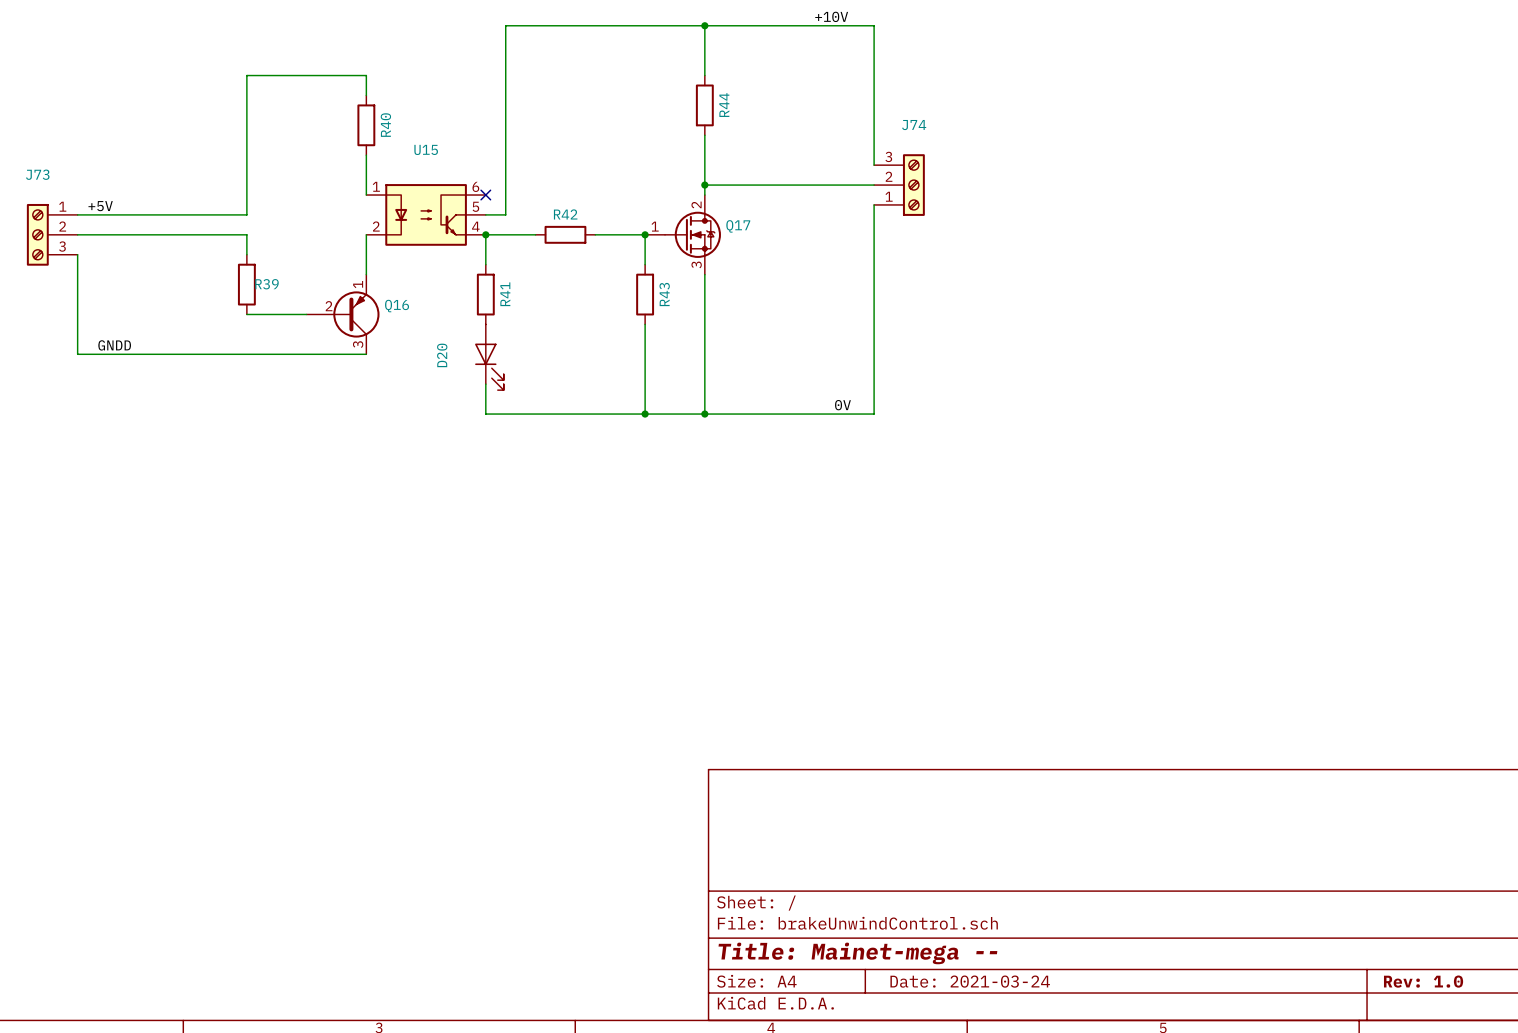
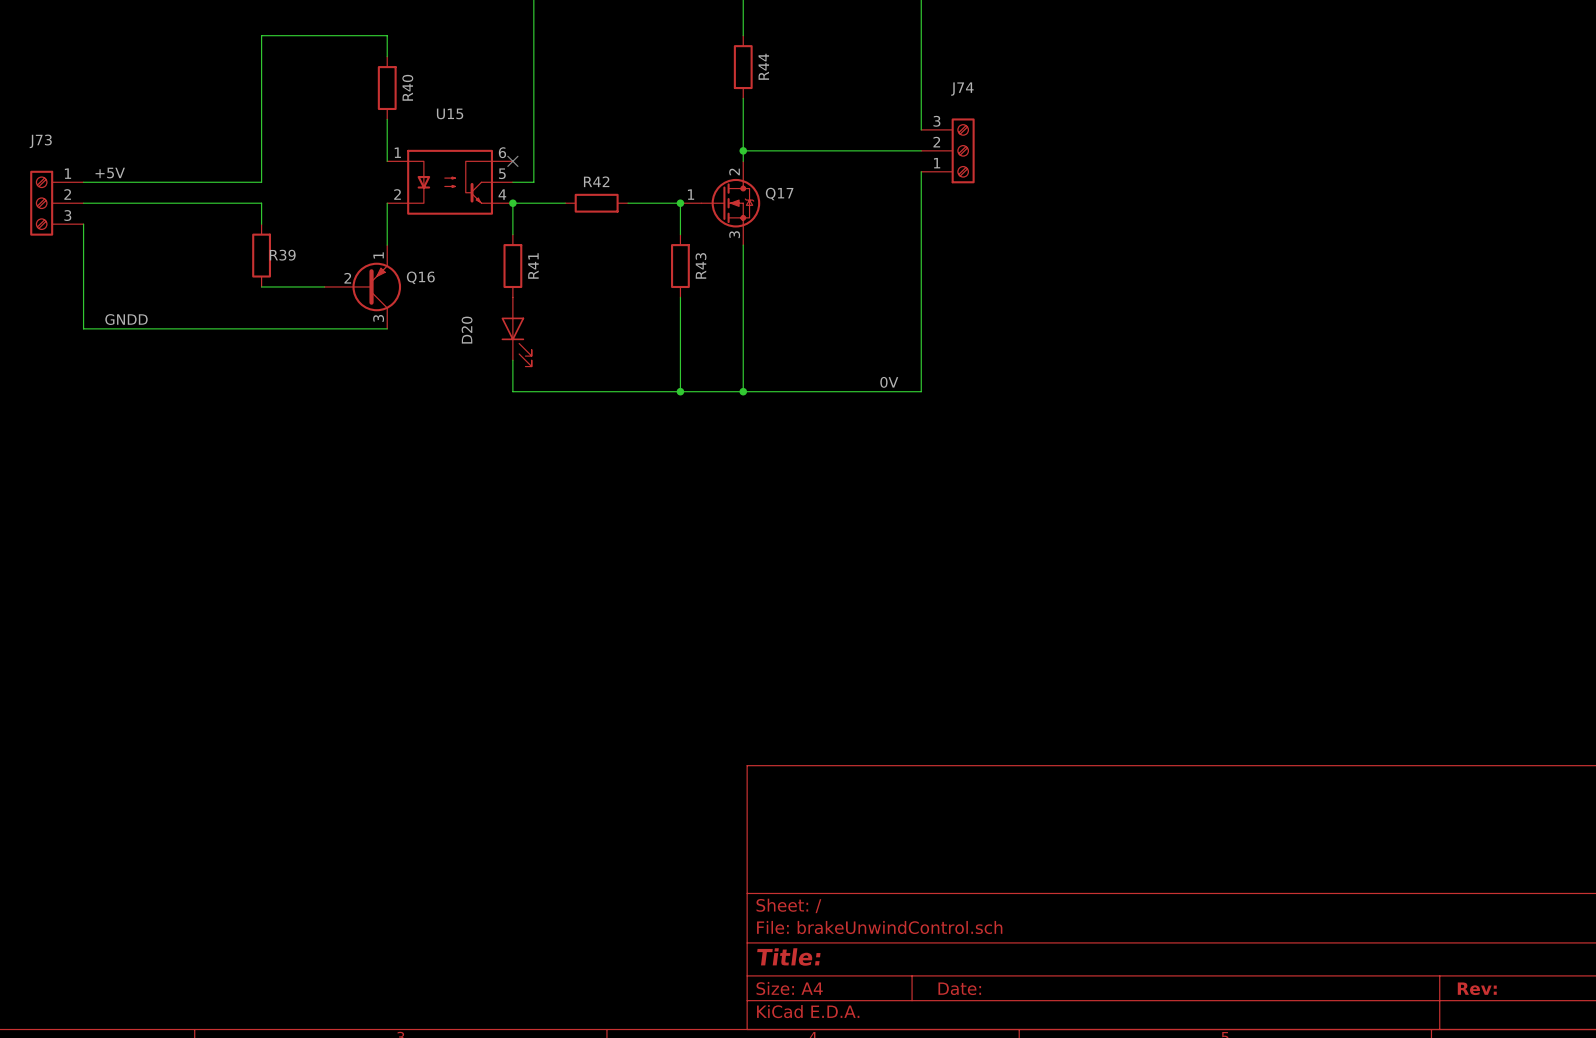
title block: Title: Mainet-mega -- (857, 953) -> Title: (788, 956)
title block: Date: 2021-03-24 (970, 981) -> Date: (959, 988)
title block: Rev: 1.0 (1423, 981) -> Rev: (1477, 988)

